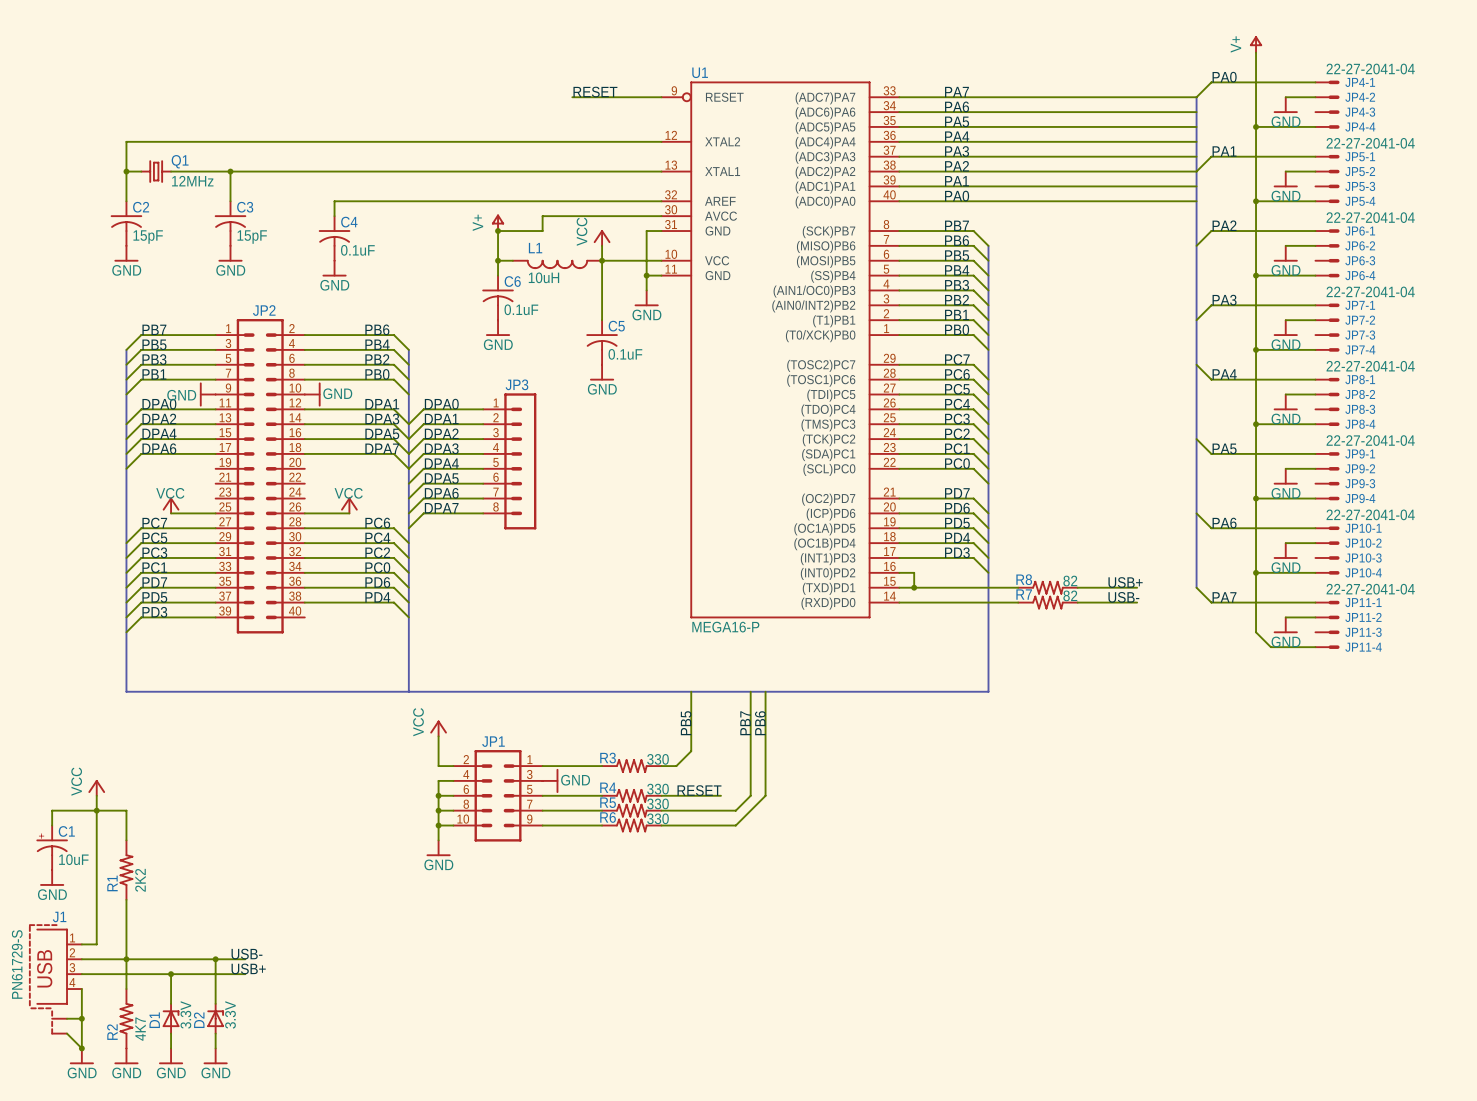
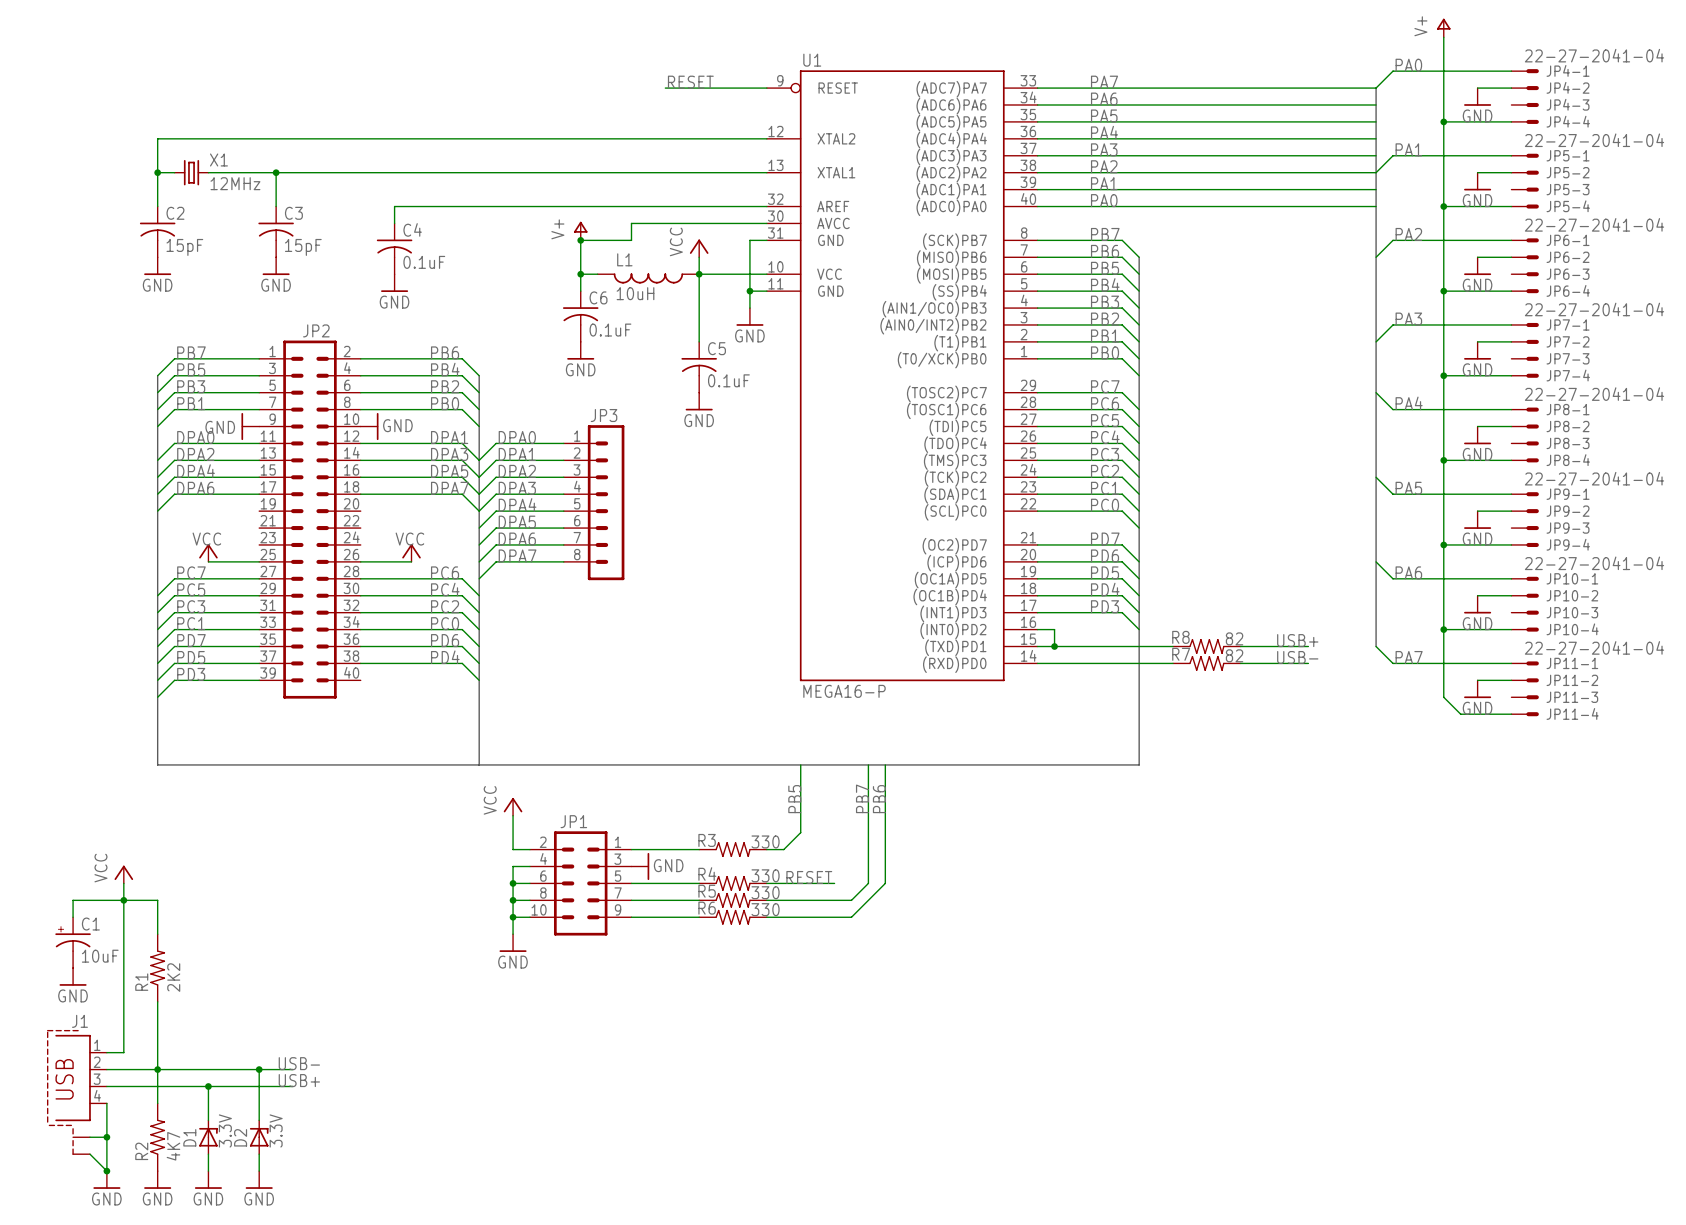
Q1 name: Q1 (180, 161) -> X1 (218, 159)
J1 value: PN61729-S (17, 964) -> none

